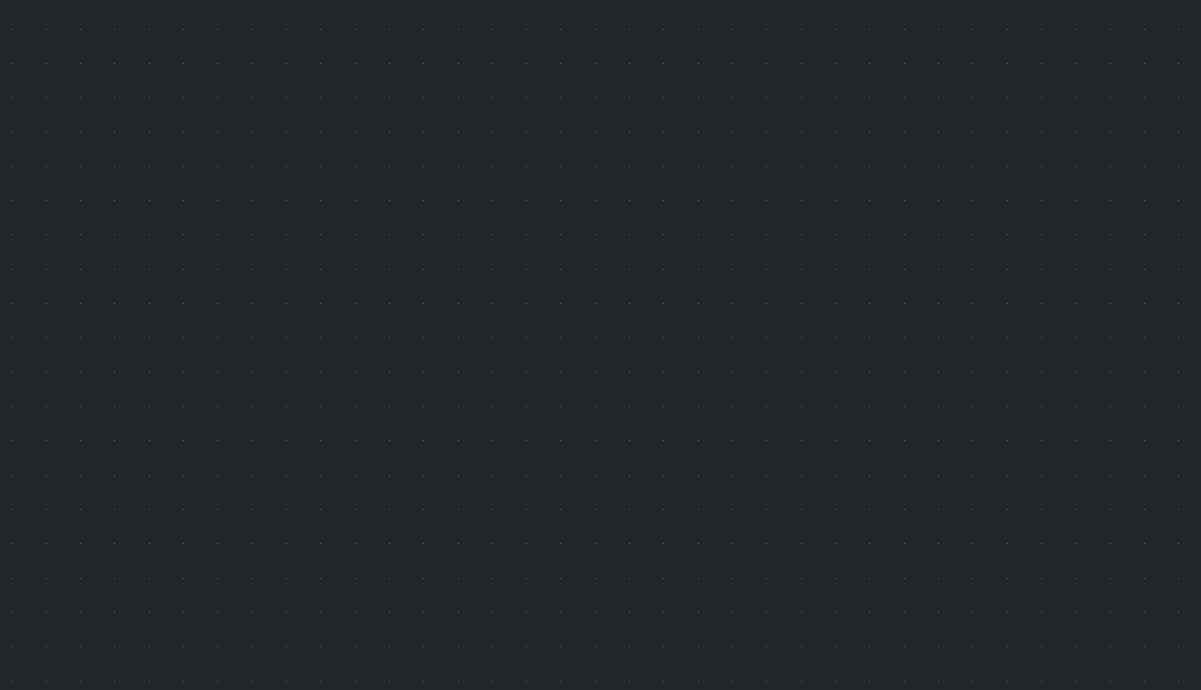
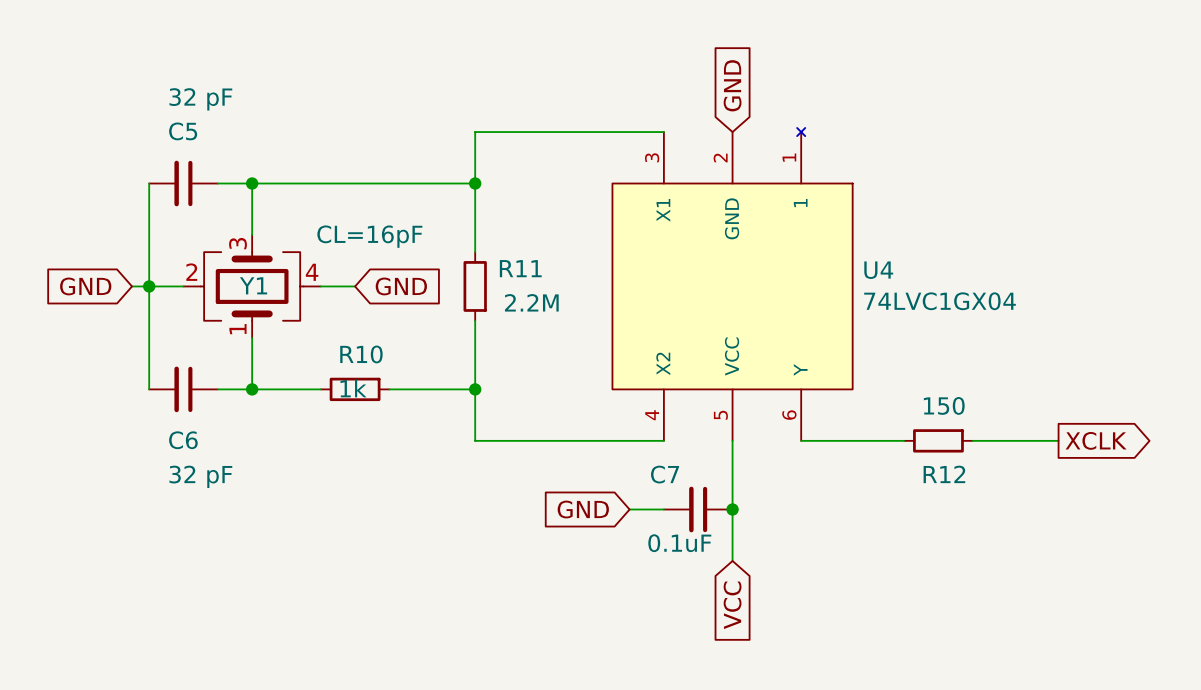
global label: none -> GND (732, 85)
wire: none -> (663, 132) (475, 132) (475, 252)
wire: none -> (149, 183) (149, 389)
C5: none -> 32 pF (183, 183)
wire: none -> (217, 183) (475, 183)
wire: none -> (252, 183) (252, 234)
junction: none -> (252, 183)
junction: none -> (475, 183)
U4: none -> 74LVC1GX04 (732, 284)
global label: none -> GND (85, 286)
wire: none -> (132, 286) (183, 286)
junction: none -> (149, 286)
Y1: none -> CL=16pF (252, 286)
wire: none -> (320, 286) (355, 286)
global label: none -> GND (401, 286)
R11: none -> 2.2M (475, 286)
wire: none -> (475, 320) (475, 440) (663, 440)
wire: none -> (252, 337) (252, 389)
C6: none -> 32 pF (183, 389)
wire: none -> (217, 389) (320, 389)
junction: none -> (252, 389)
R10: none -> 1k (355, 389)
wire: none -> (389, 389) (475, 389)
junction: none -> (475, 389)
wire: none -> (732, 440) (732, 560)
wire: none -> (801, 440) (904, 440)
R12: none -> 150 (938, 440)
wire: none -> (972, 440) (1058, 440)
global label: none -> XCLK (1096, 440)
global label: none -> GND (583, 509)
wire: none -> (629, 509) (663, 509)
C7: none -> 0.1uF (698, 509)
junction: none -> (732, 509)
global label: none -> VCC (732, 605)

